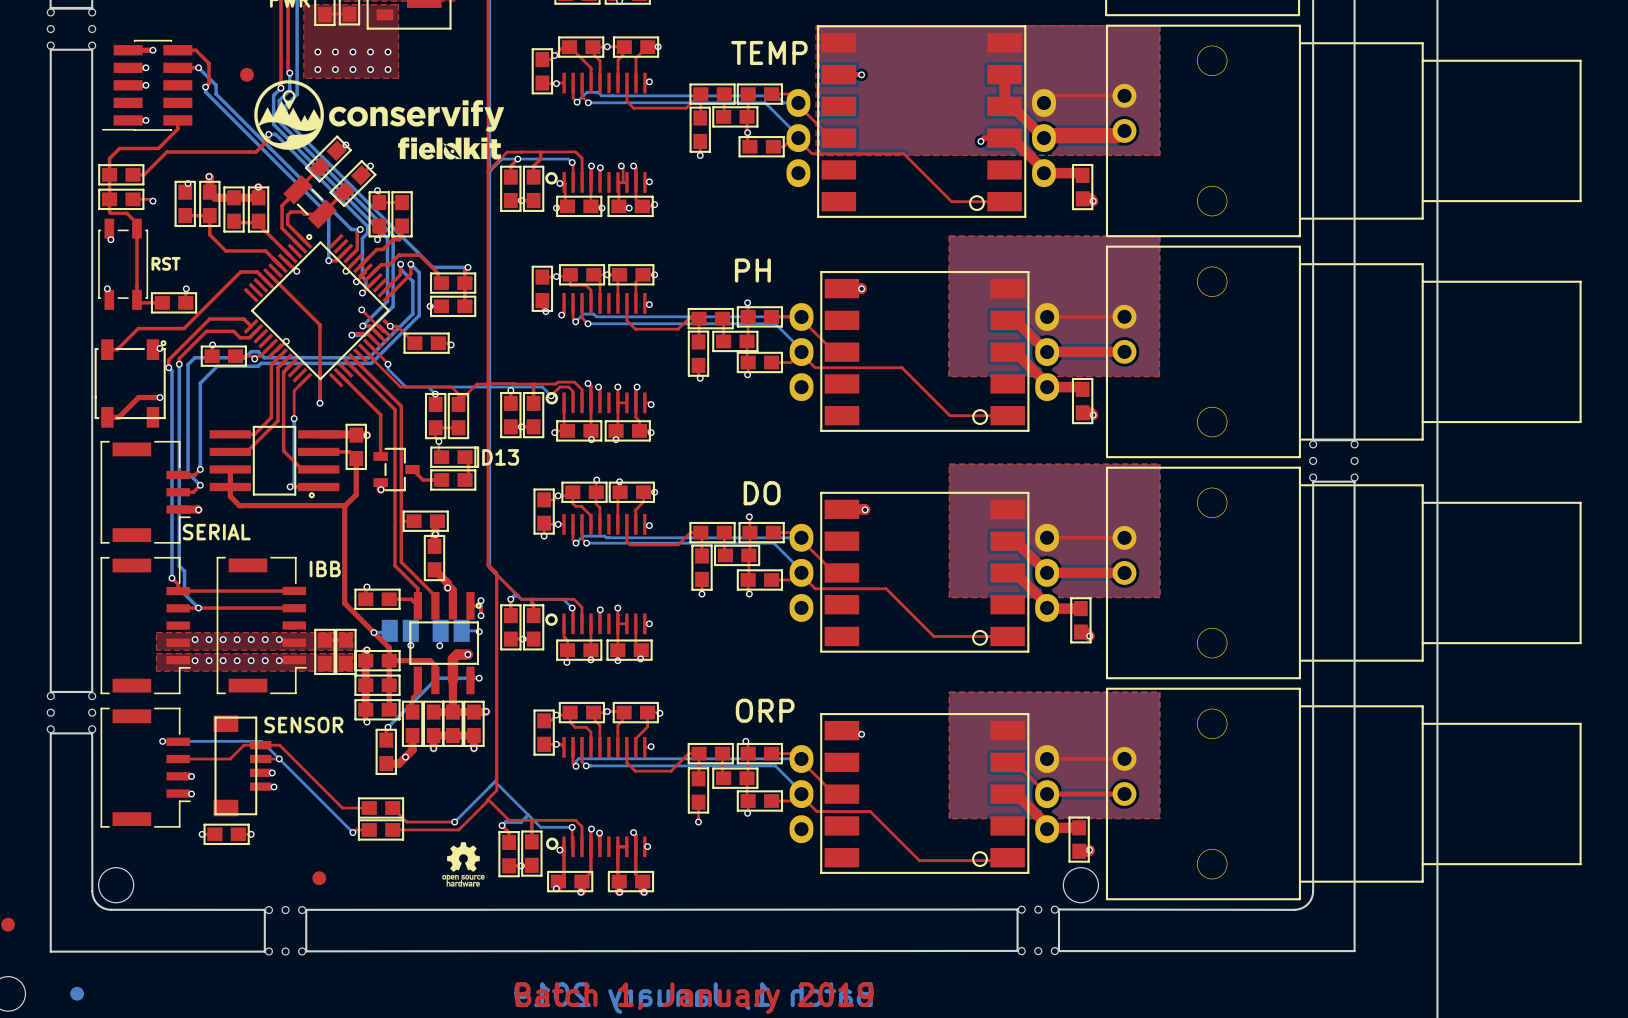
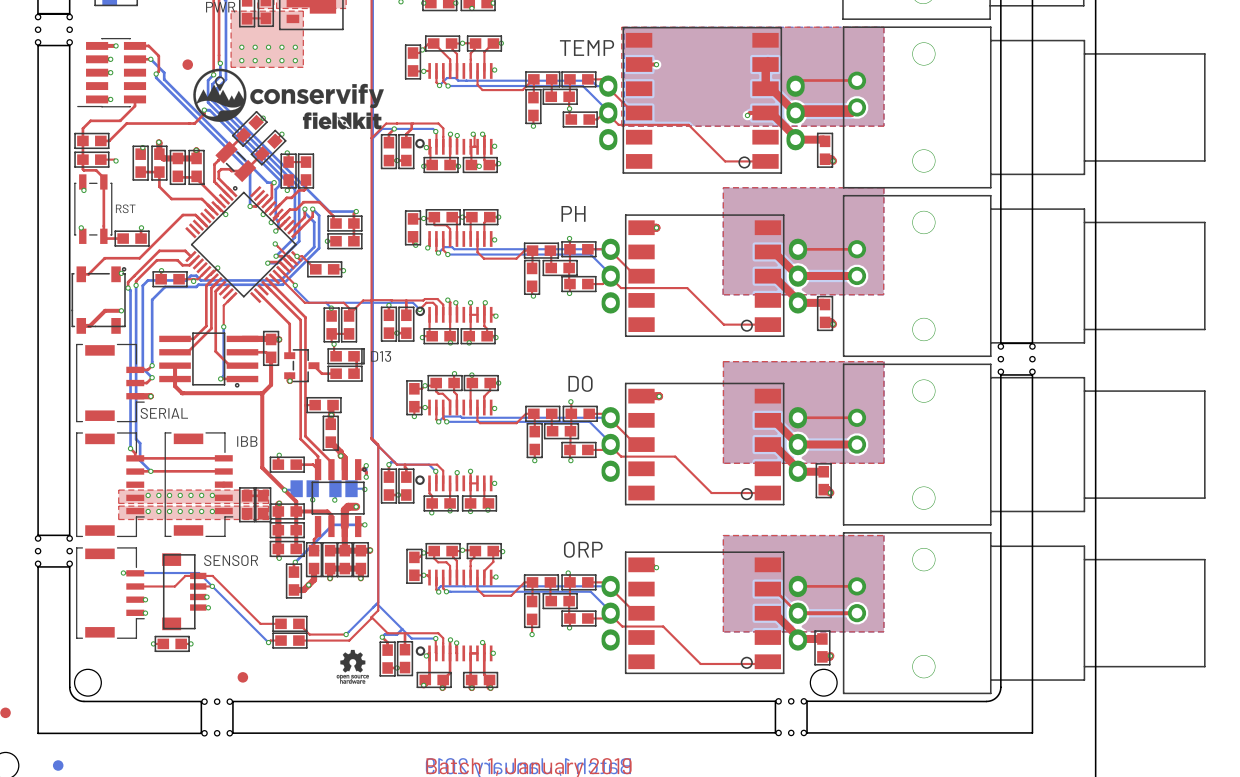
top track: (270, 275) (319, 324) (319, 403) -> none
via: (319, 403) -> none

